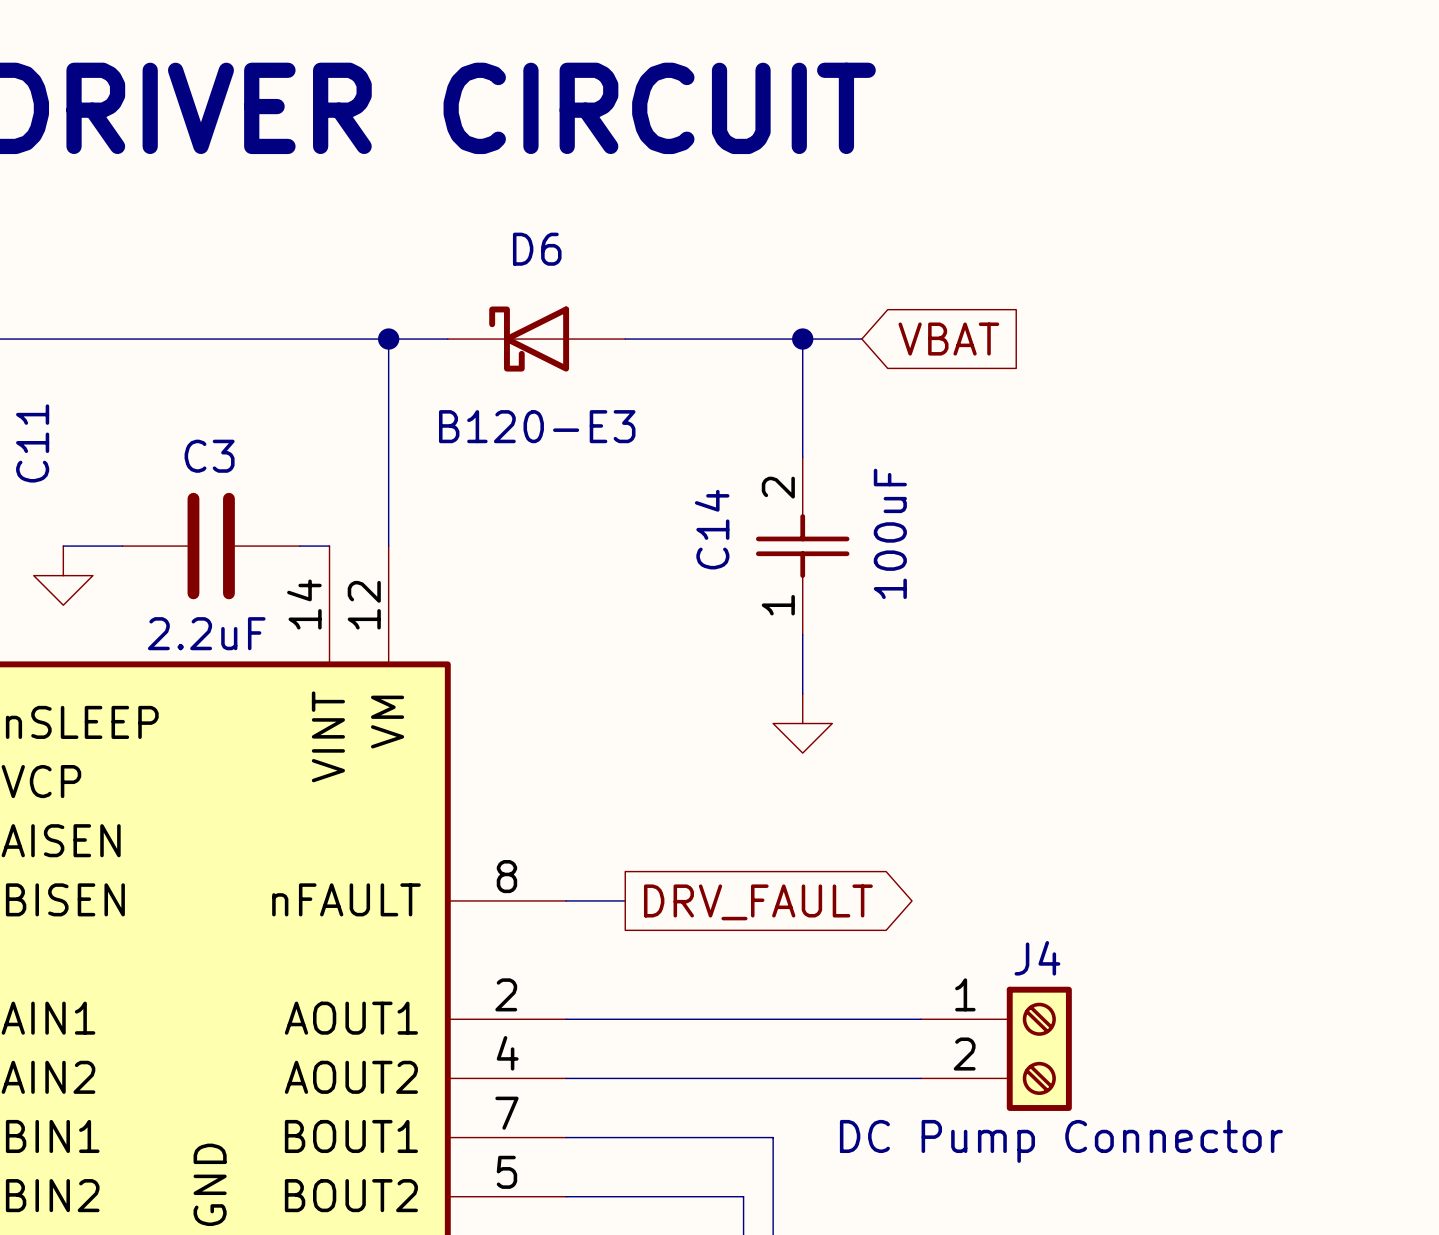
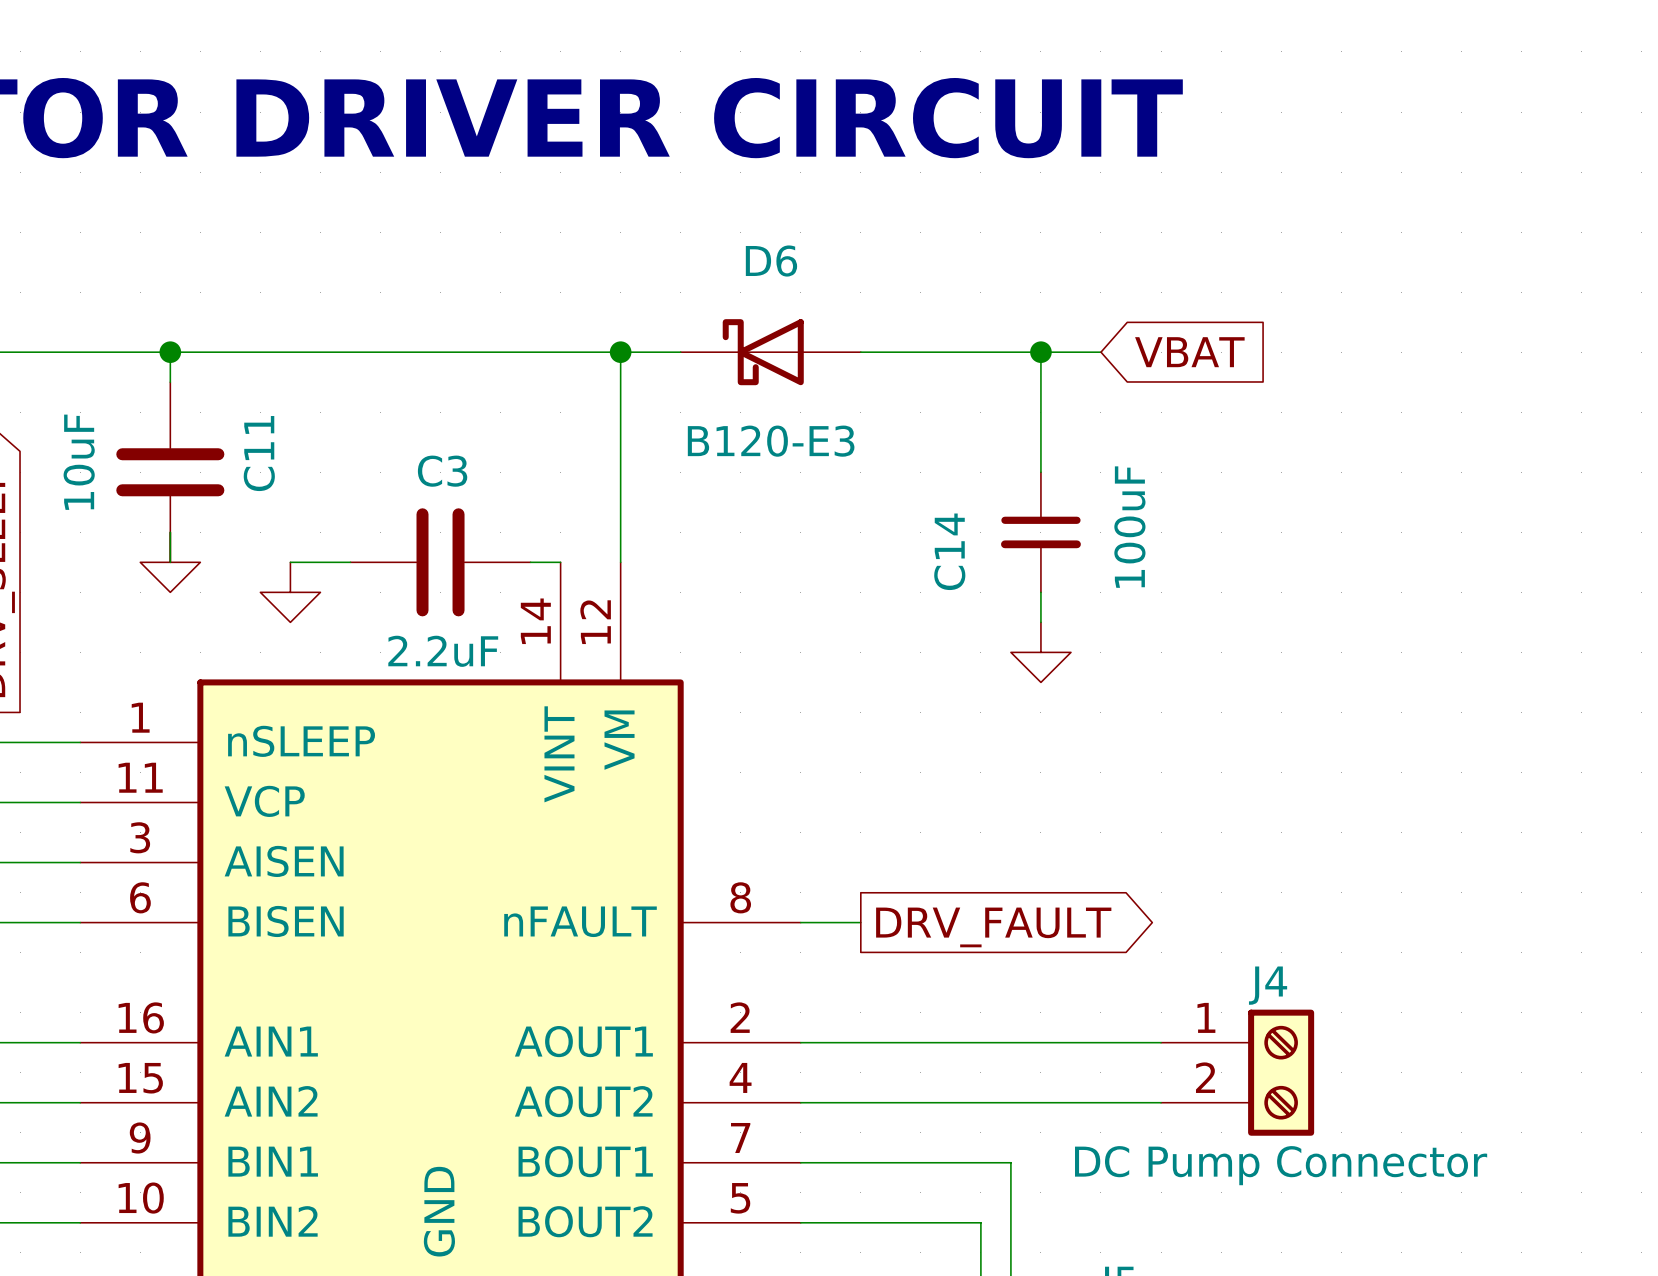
C14 symbol: [755, 457, 850, 635] -> [1001, 472, 1081, 593]
wire: (802, 634) (802, 693) -> none
power symbol position: (802, 723) -> (1040, 652)

